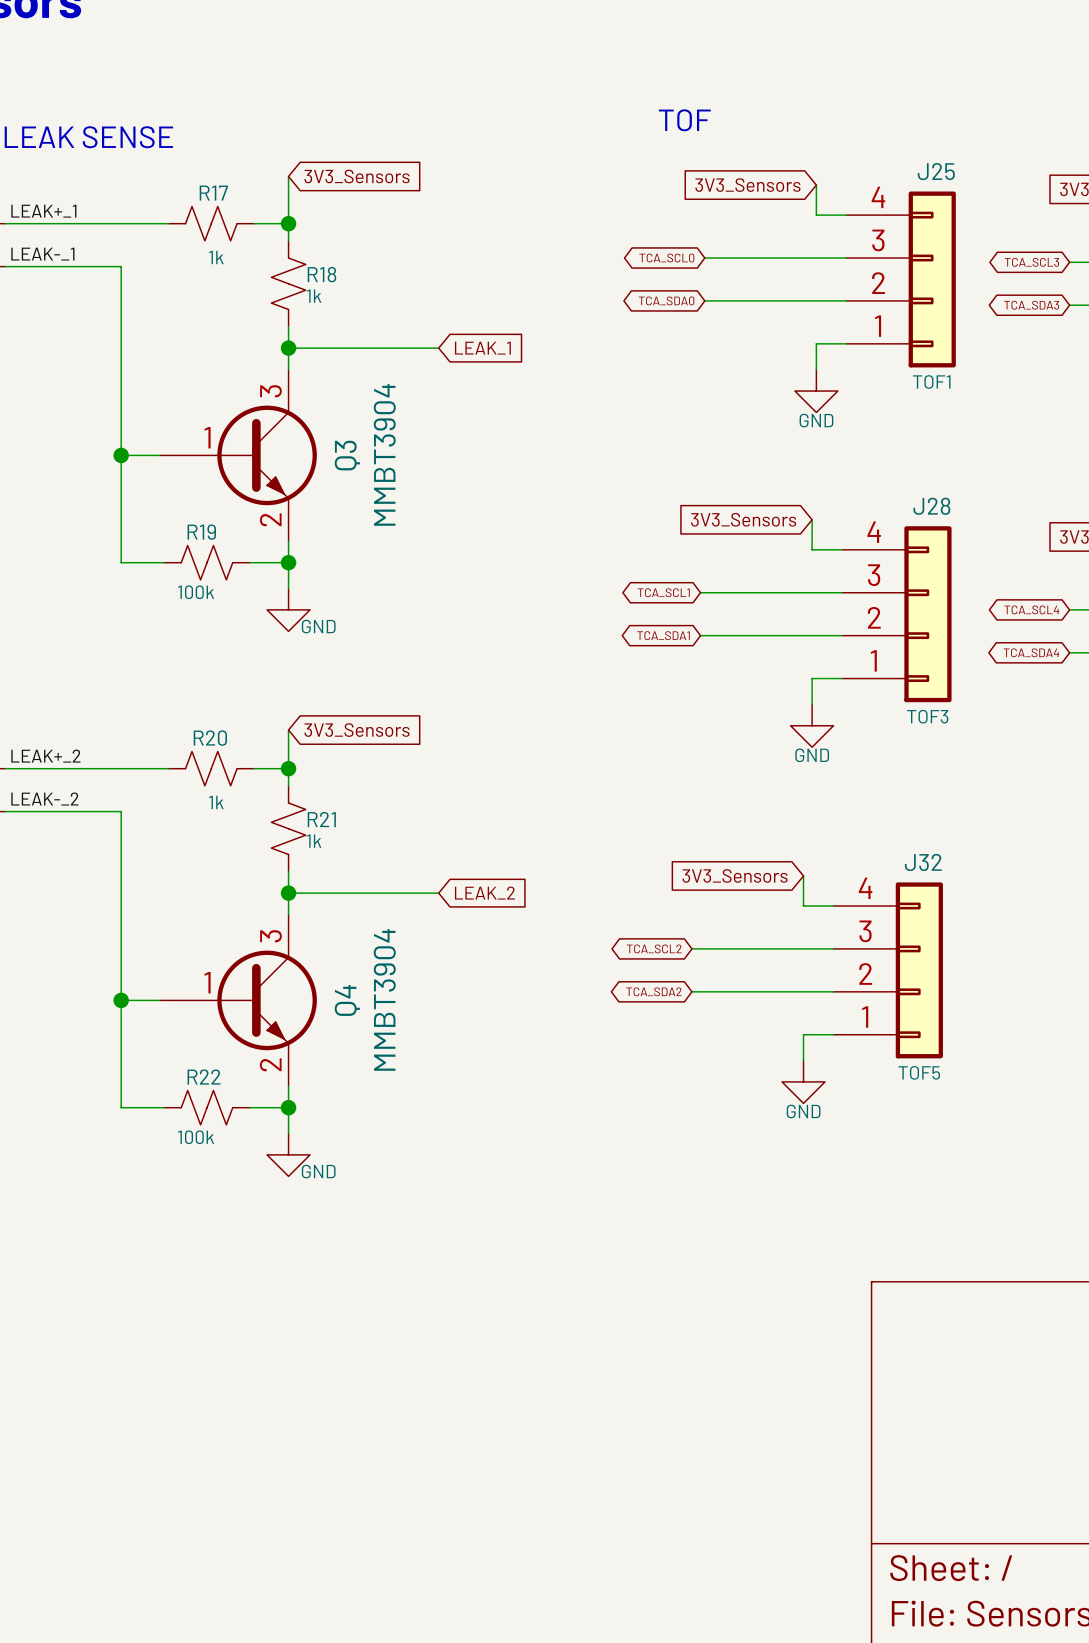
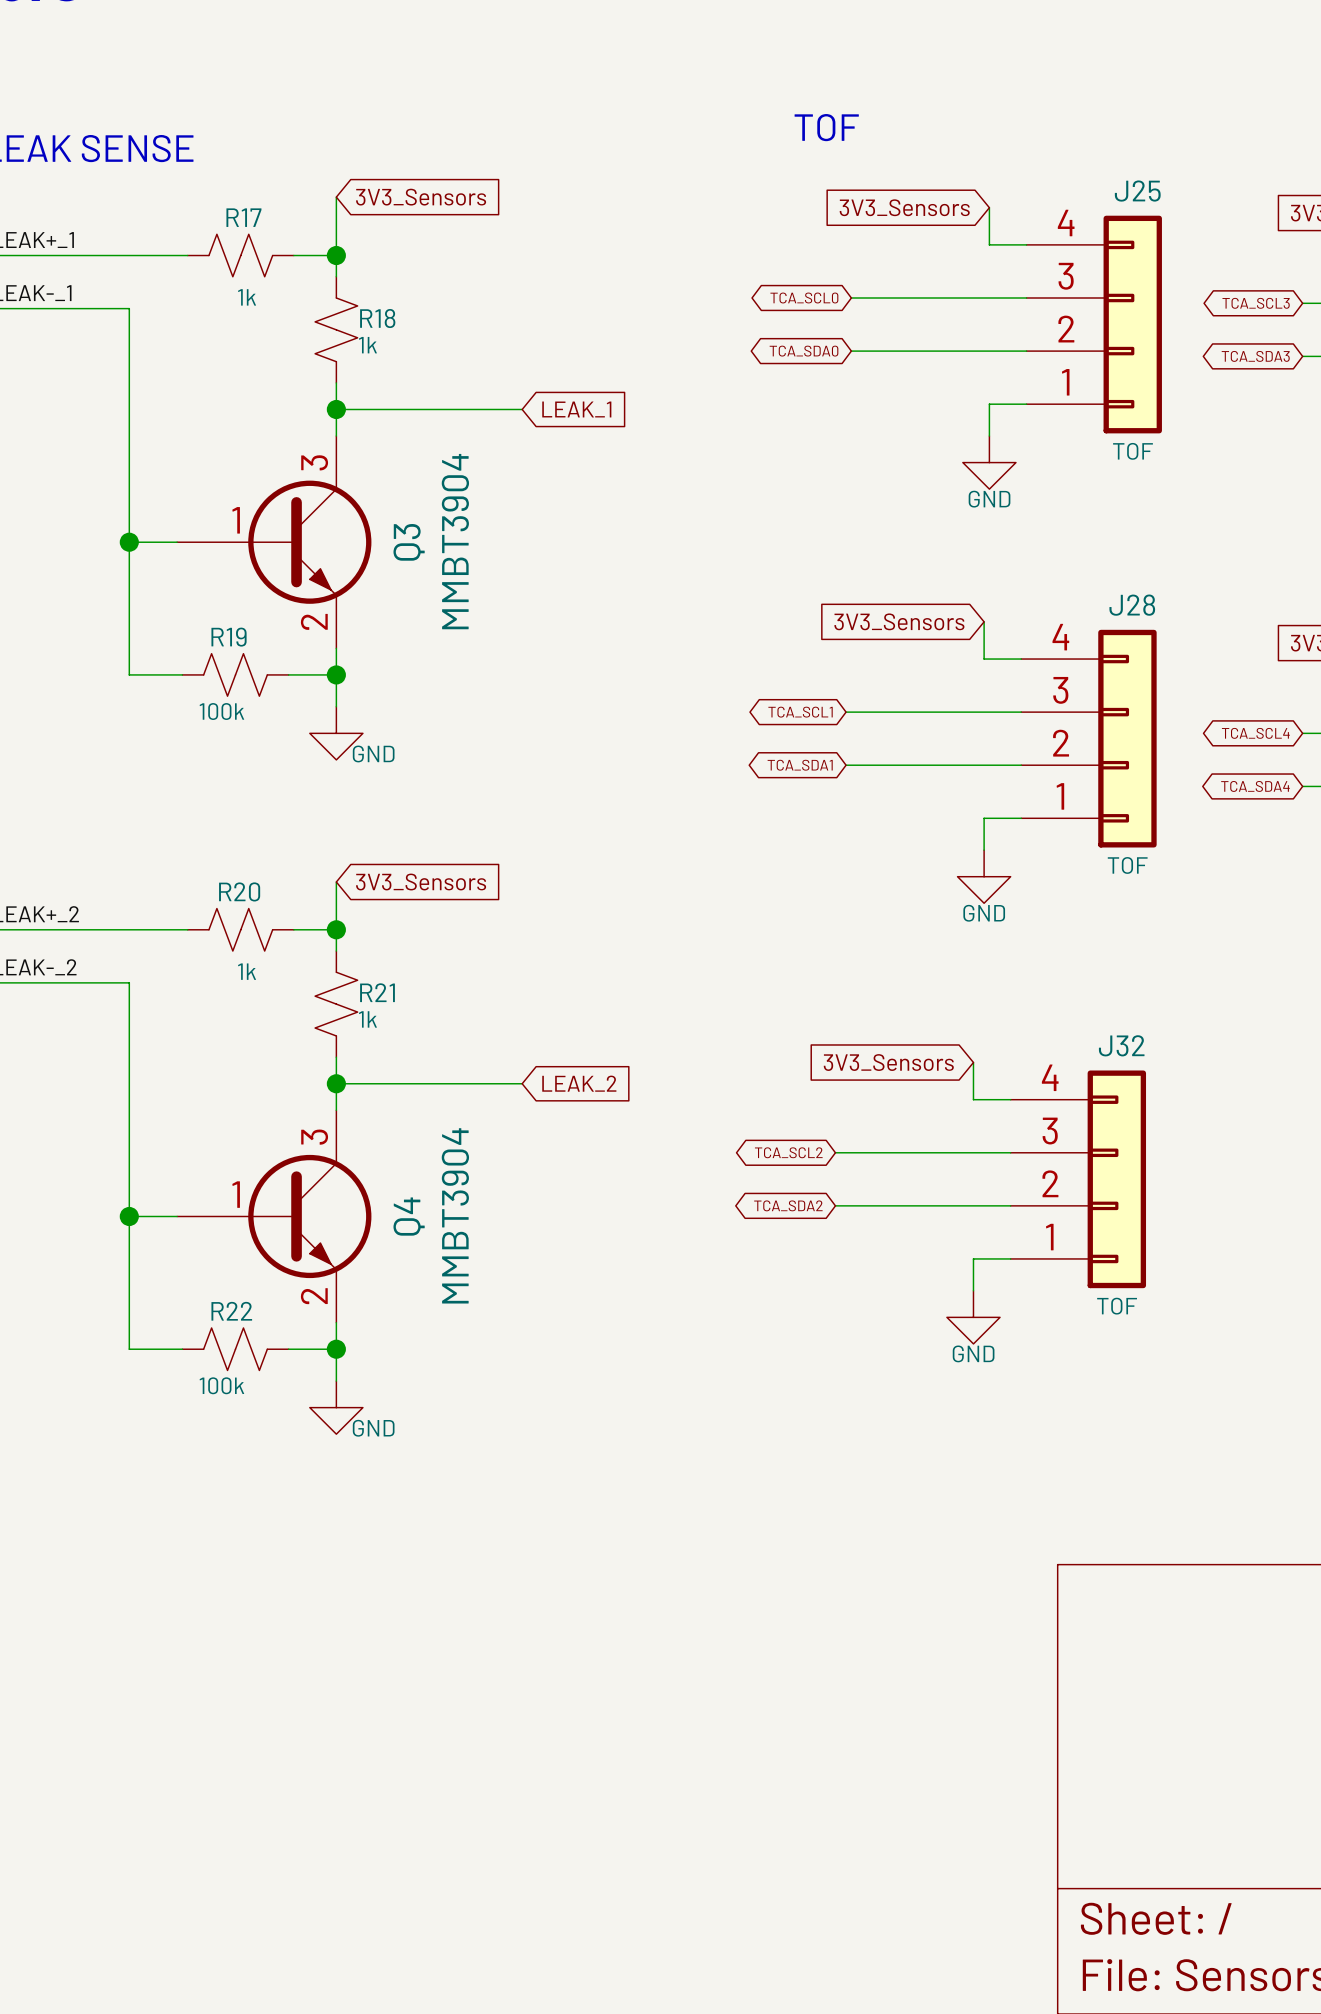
J25 value: TOF1 (931, 381) -> TOF (1133, 451)
J28 value: TOF3 (927, 716) -> TOF (1127, 865)
J32 value: TOF5 (919, 1072) -> TOF (1117, 1306)

